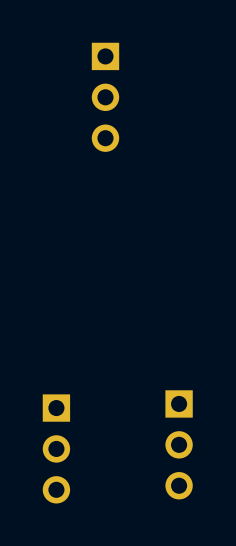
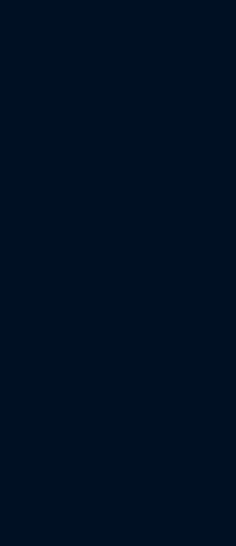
part: (105, 97) -> none
part: (179, 444) -> none
part: (56, 448) -> none

